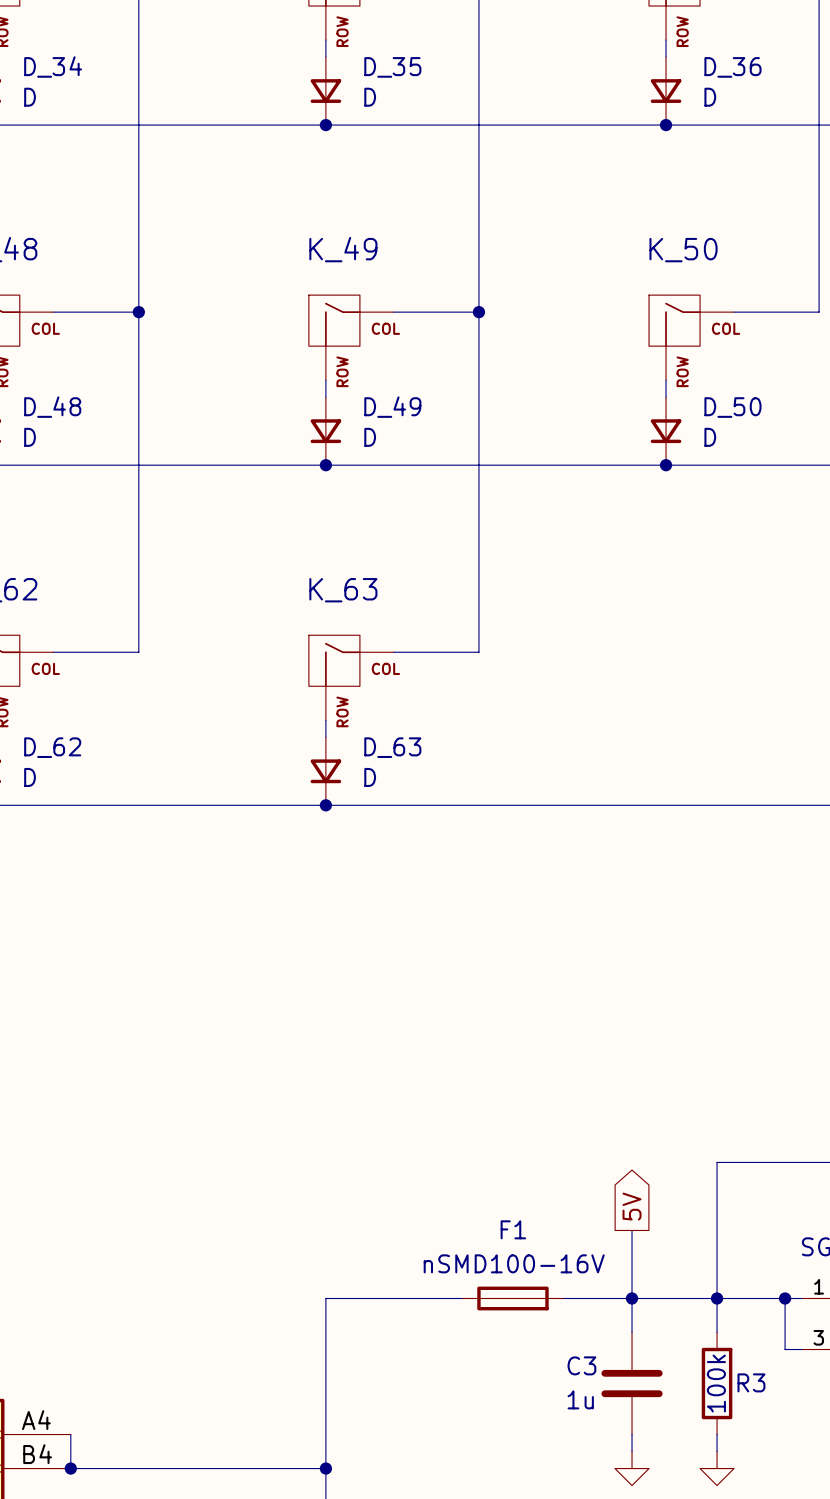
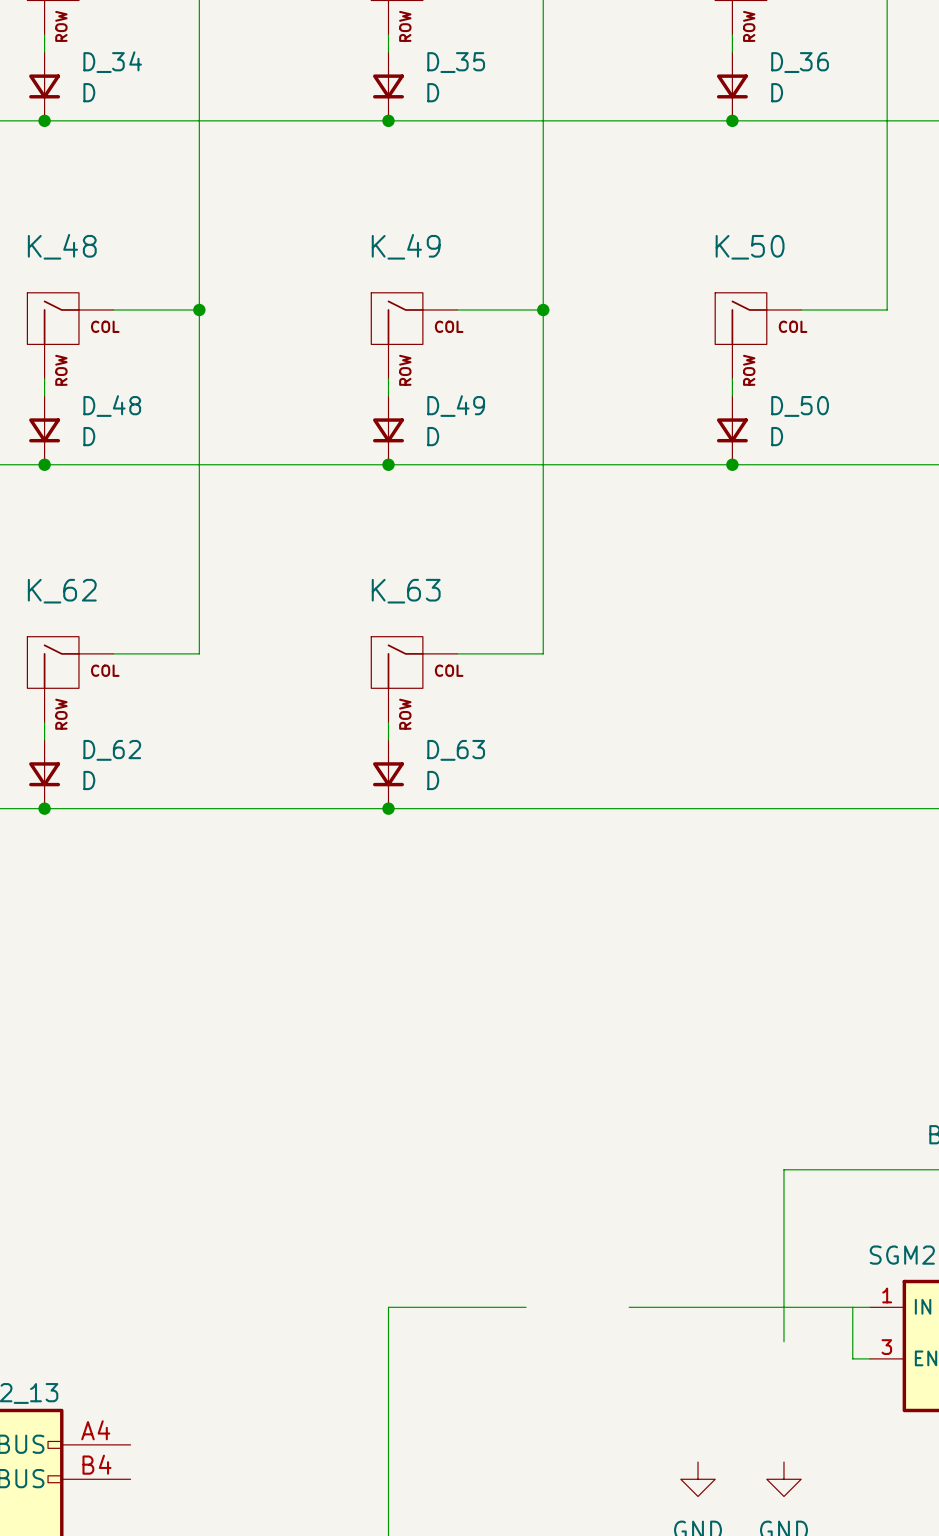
global label: 5V (632, 1206) -> none
wire: (632, 1230) (632, 1332) -> none
F1: nSMD100-16V (512, 1298) -> none
junction: (632, 1298) -> none
junction: (717, 1298) -> none
junction: (785, 1298) -> none
C3: 1u (632, 1383) -> none
R3: 100k (717, 1383) -> none
wire: (70, 1434) (70, 1468) (325, 1468) -> none
wire: (632, 1434) (632, 1451) -> none
wire: (717, 1434) (717, 1451) -> none
junction: (70, 1468) -> none
junction: (325, 1468) -> none

